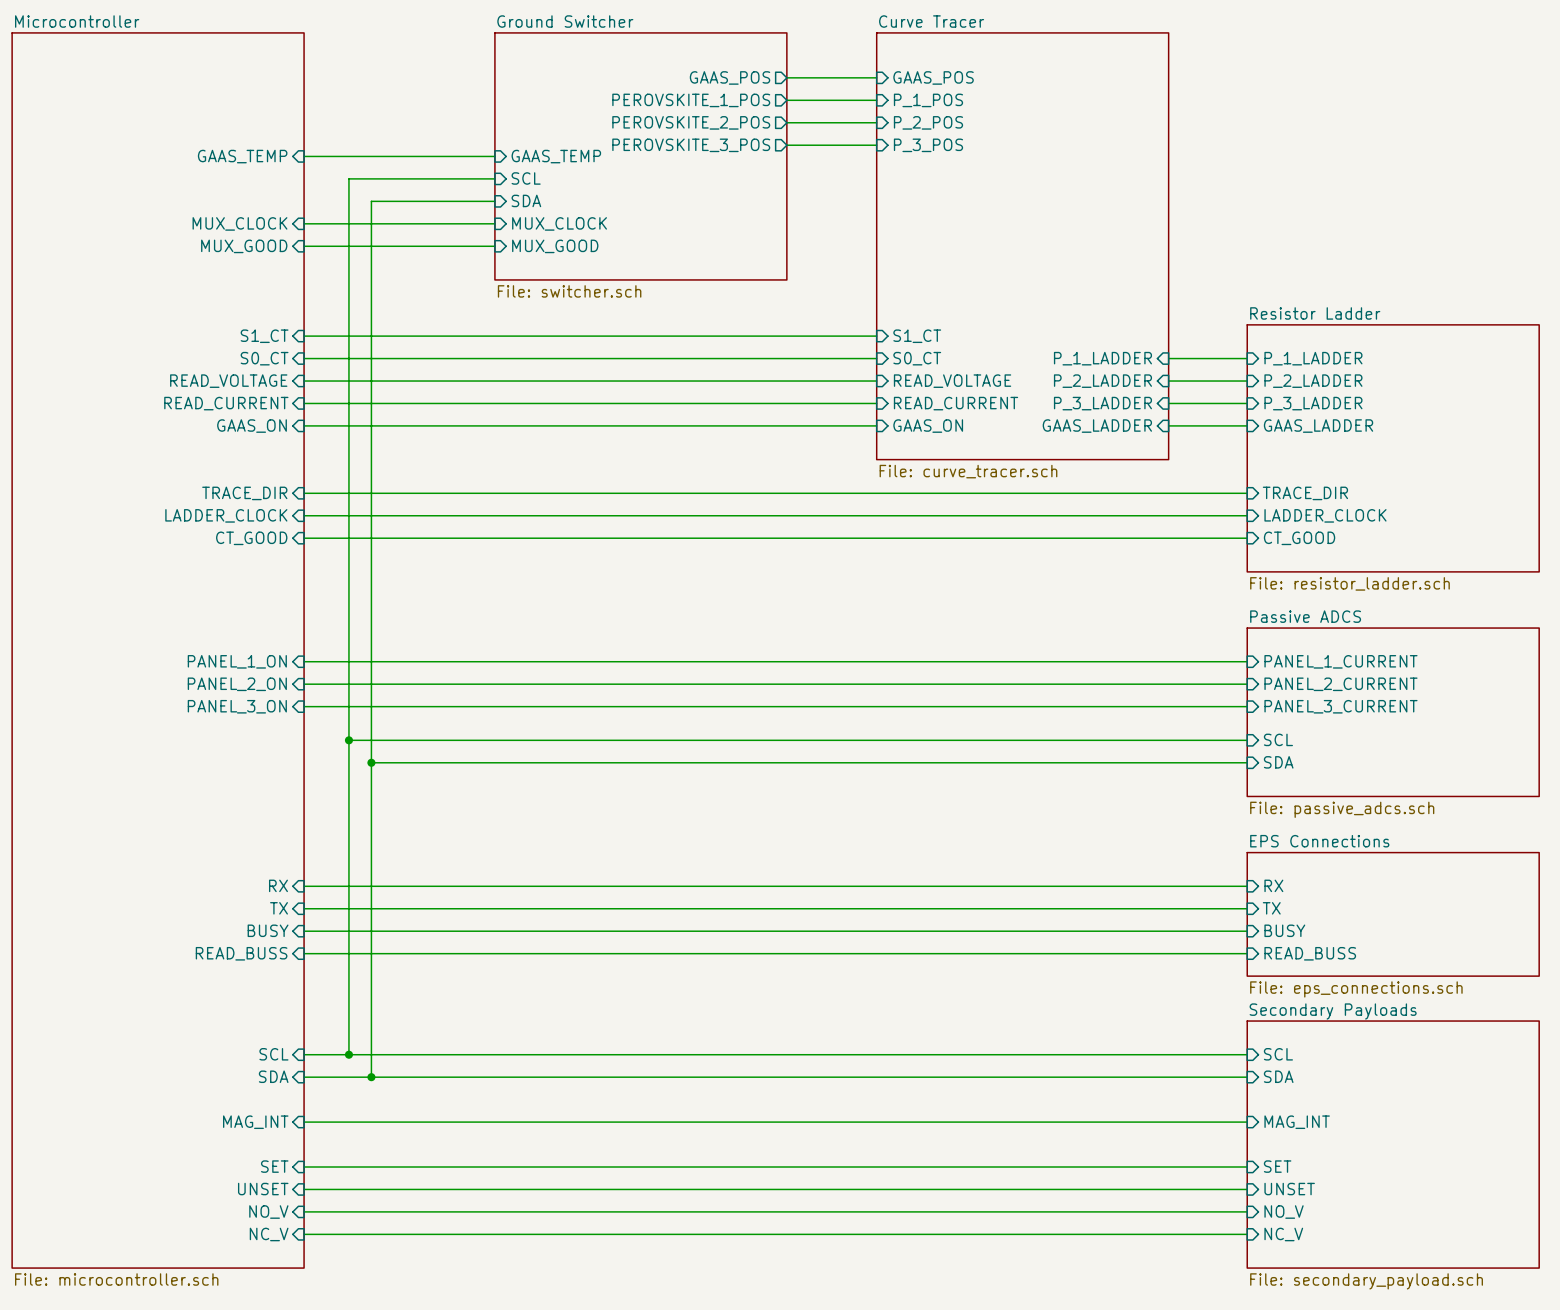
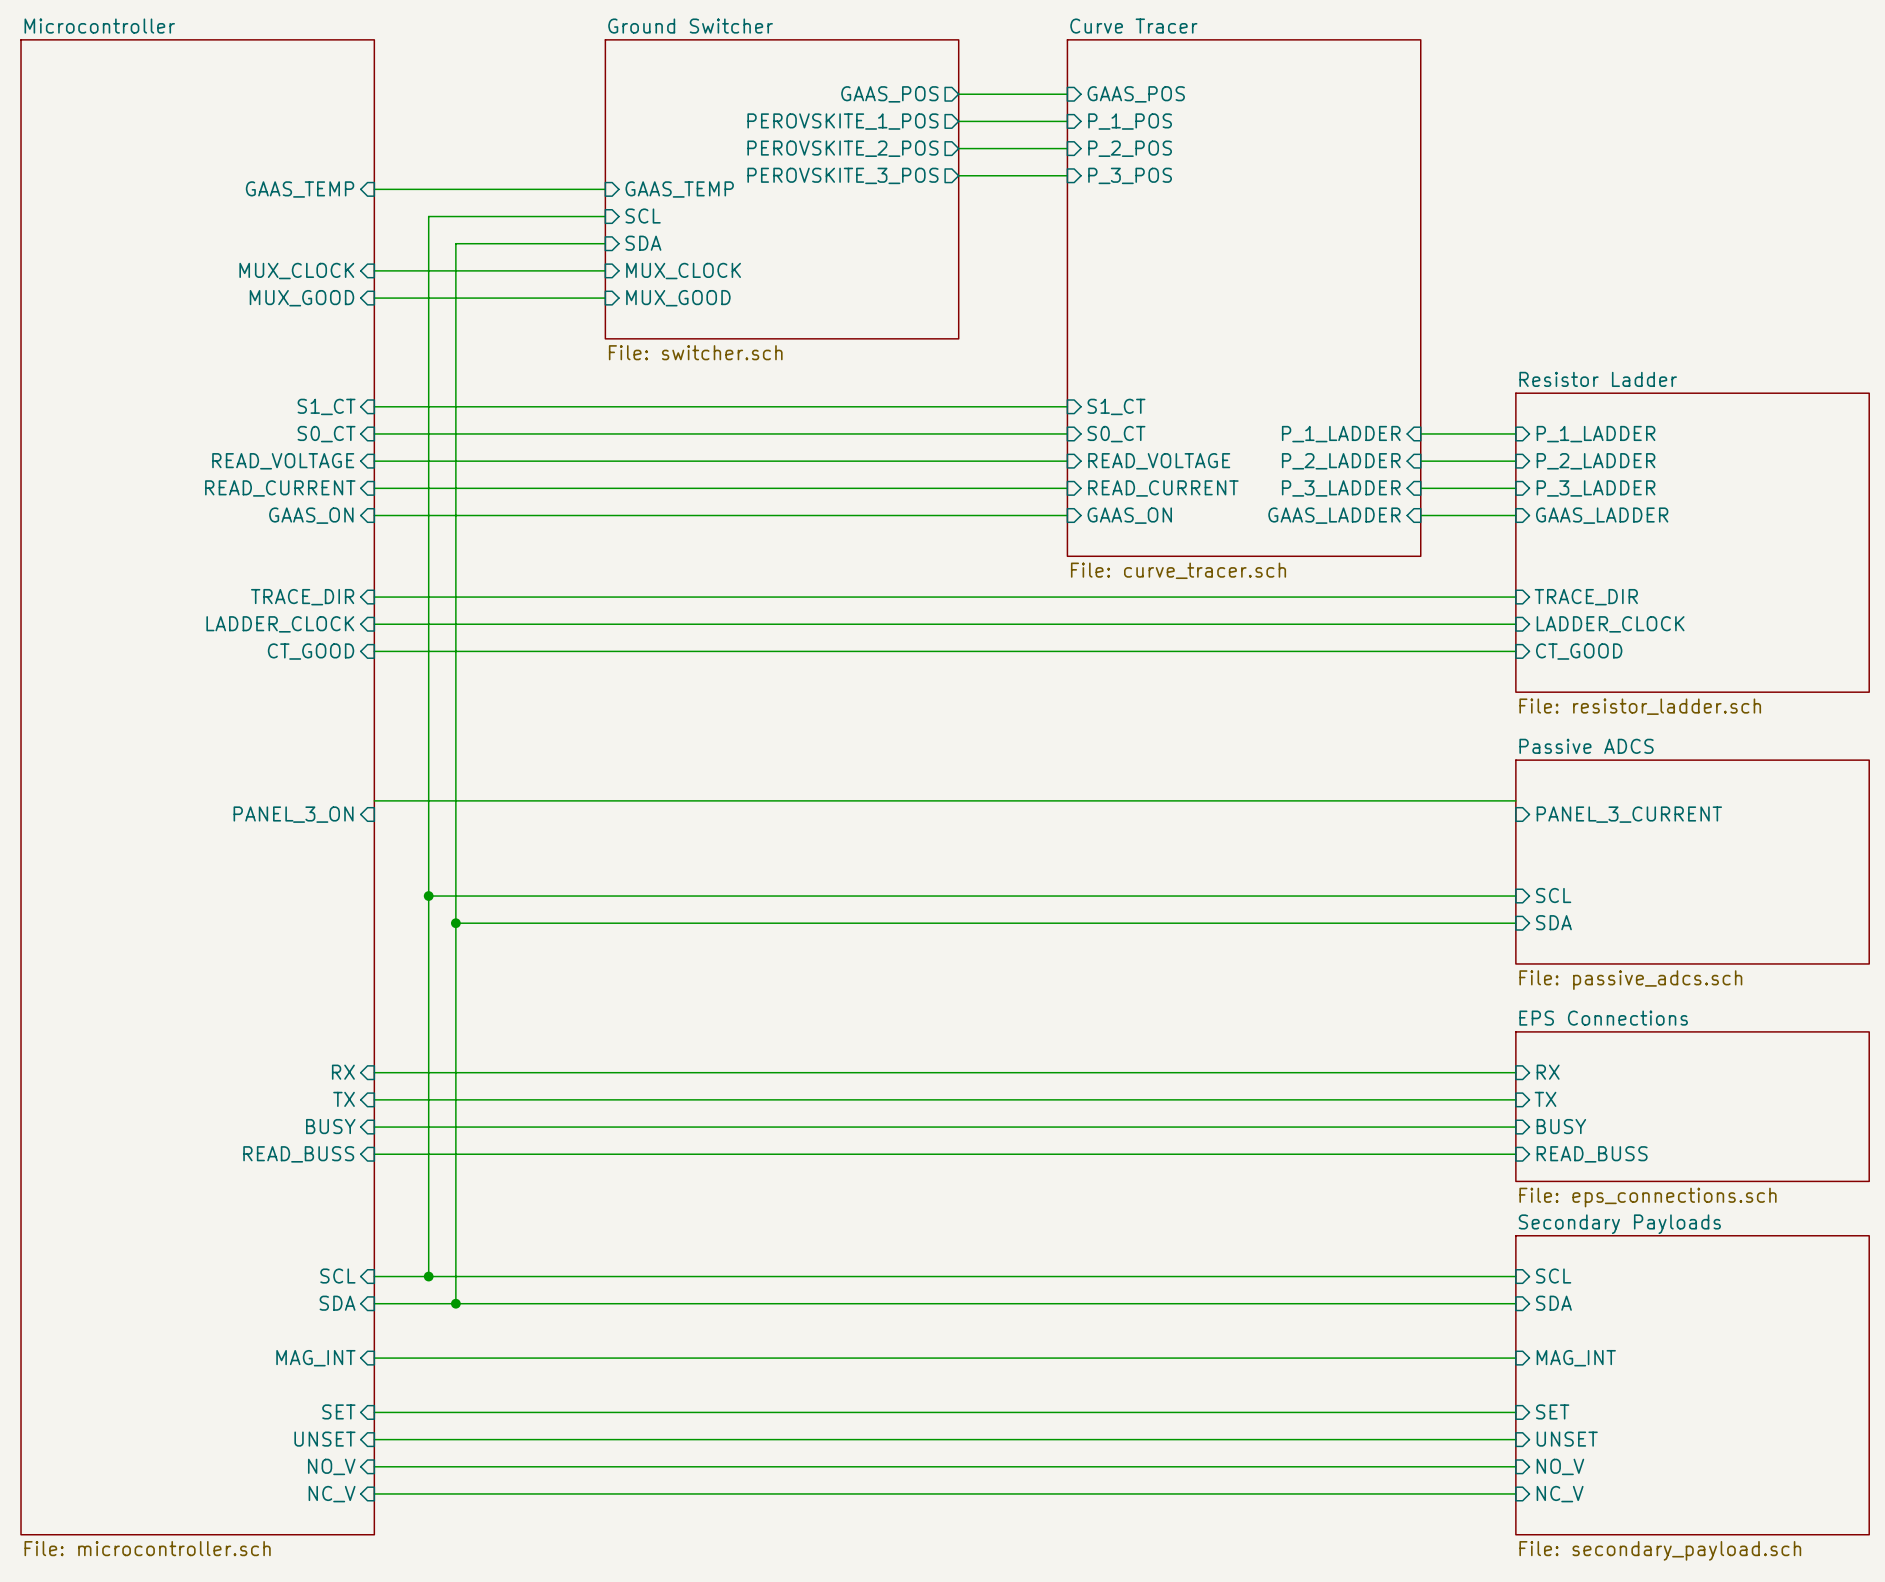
sheet pin: PANEL_1_ON (237, 661) -> none
sheet pin: PANEL_1_CURRENT (1340, 661) -> none
sheet pin: PANEL_2_ON (237, 684) -> none
wire: (304, 684) (1247, 684) -> none
sheet pin: PANEL_2_CURRENT (1340, 684) -> none
sheet pin position: PANEL_3_ON (237, 706) -> PANEL_3_ON (293, 814)
wire: (304, 706) (1247, 706) -> none
sheet pin position: PANEL_3_CURRENT (1340, 706) -> PANEL_3_CURRENT (1629, 814)

